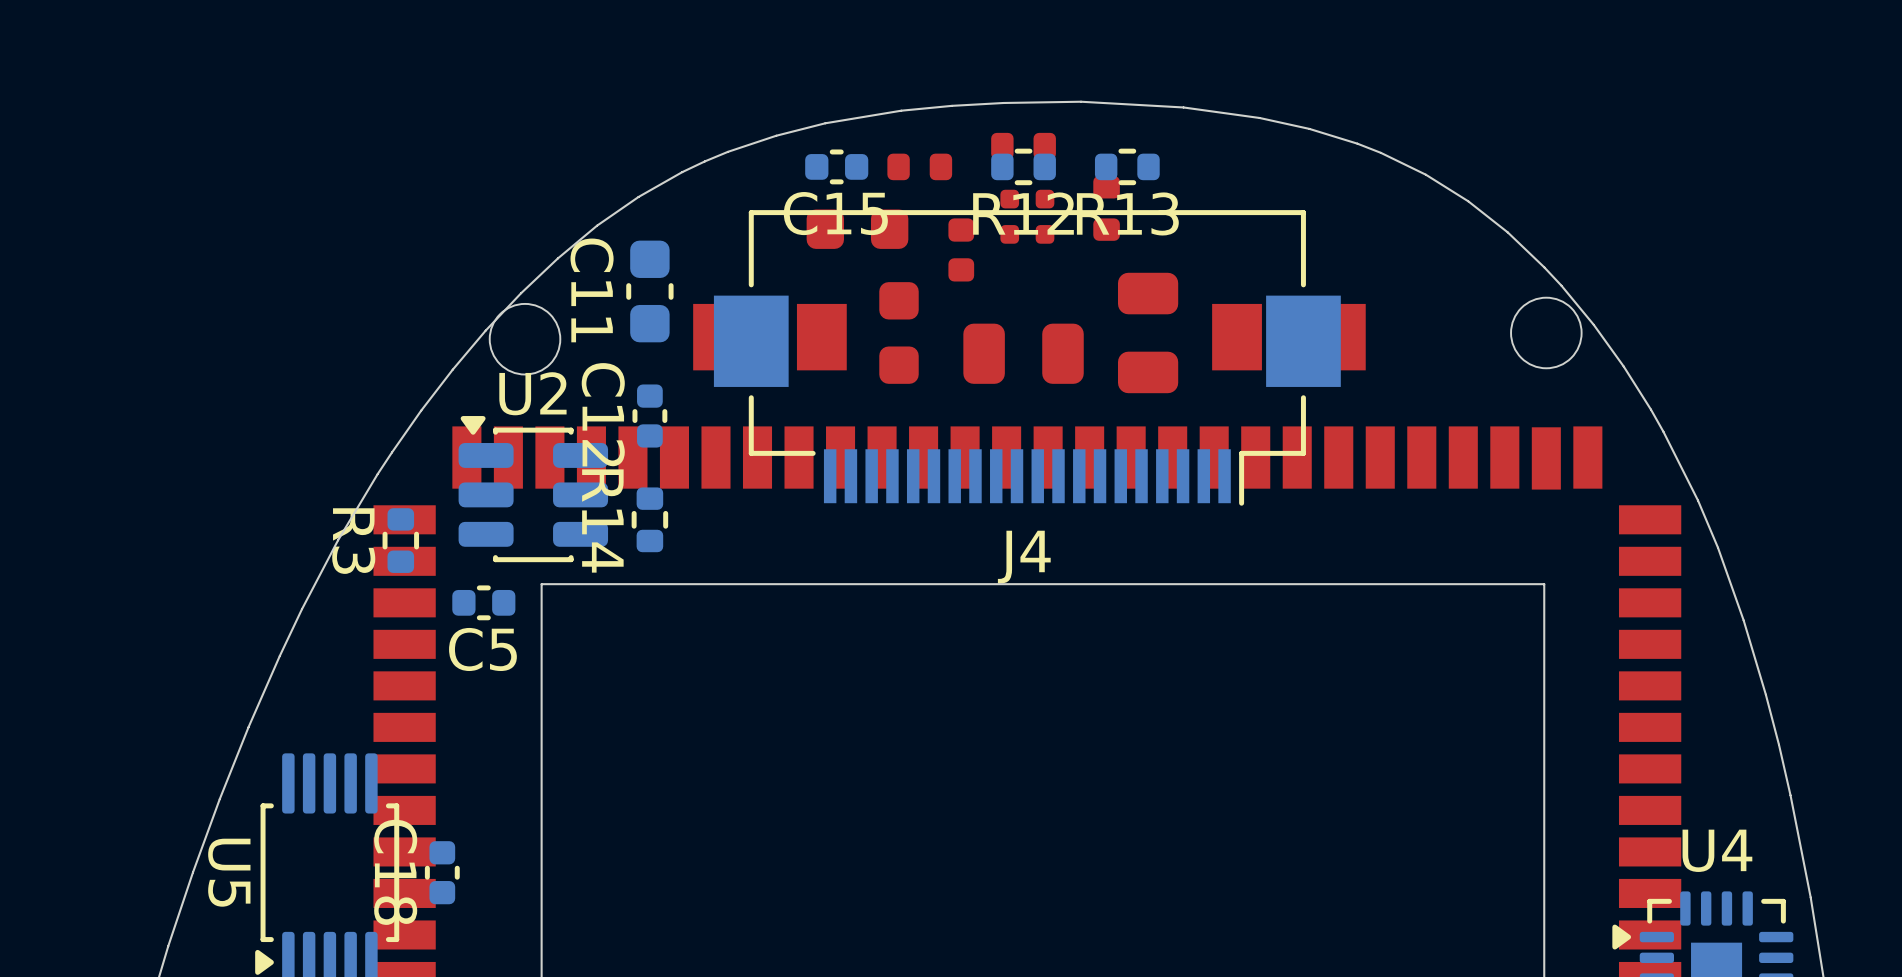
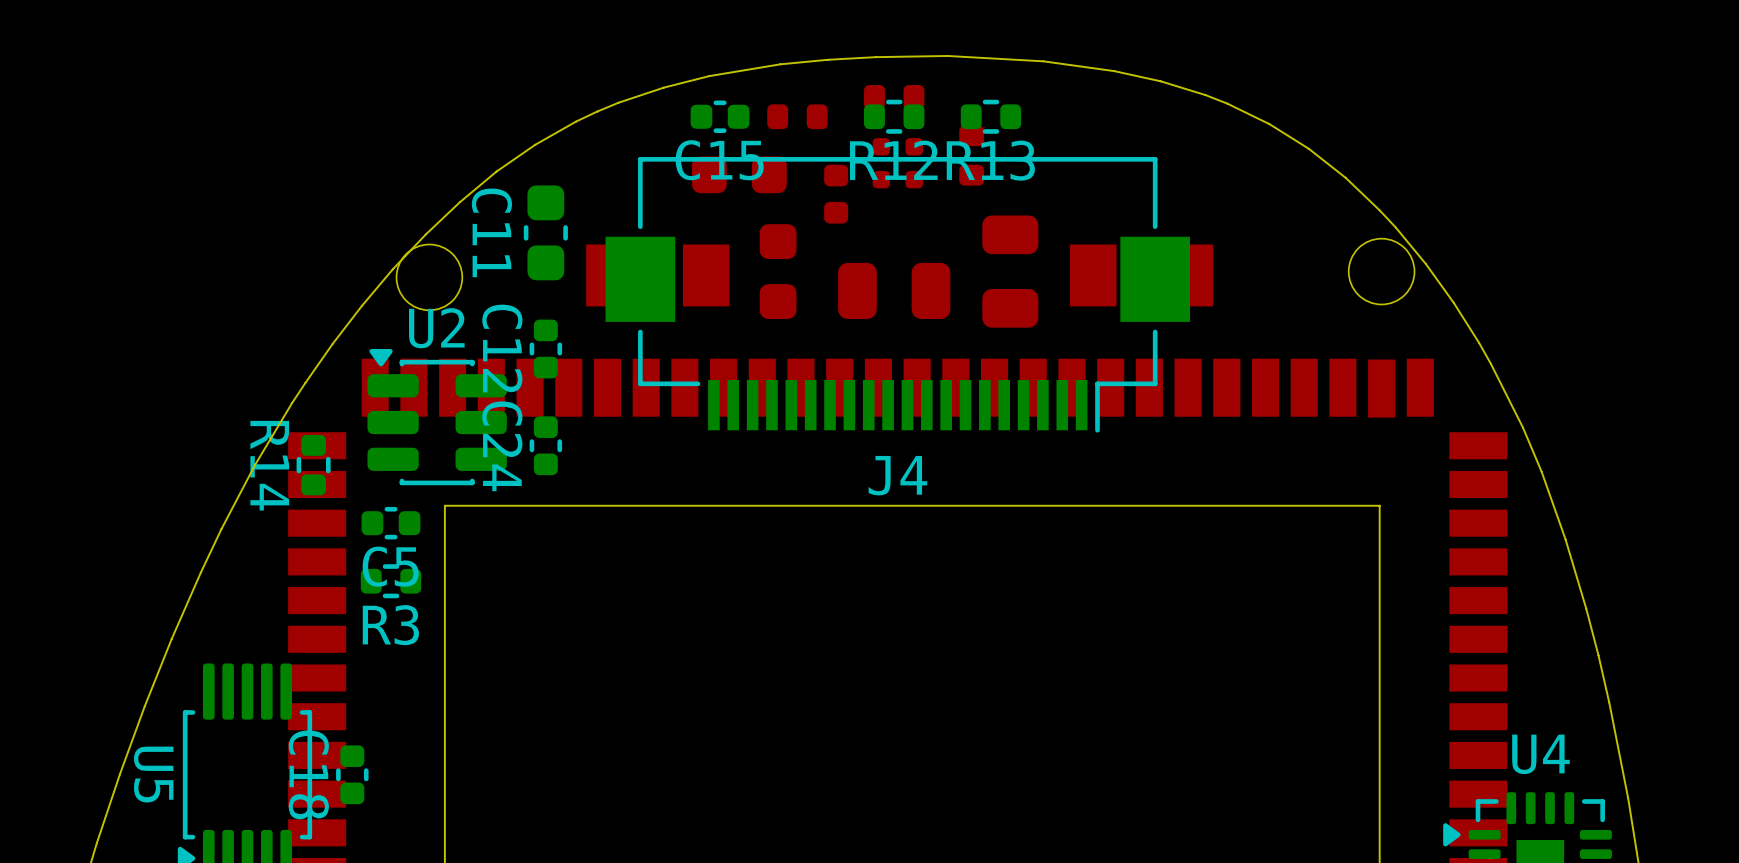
R14: (649, 519) -> none
C24: none -> (545, 445)
R3 name: R3 (353, 541) -> R14 (269, 465)
R3: none -> (391, 581)

